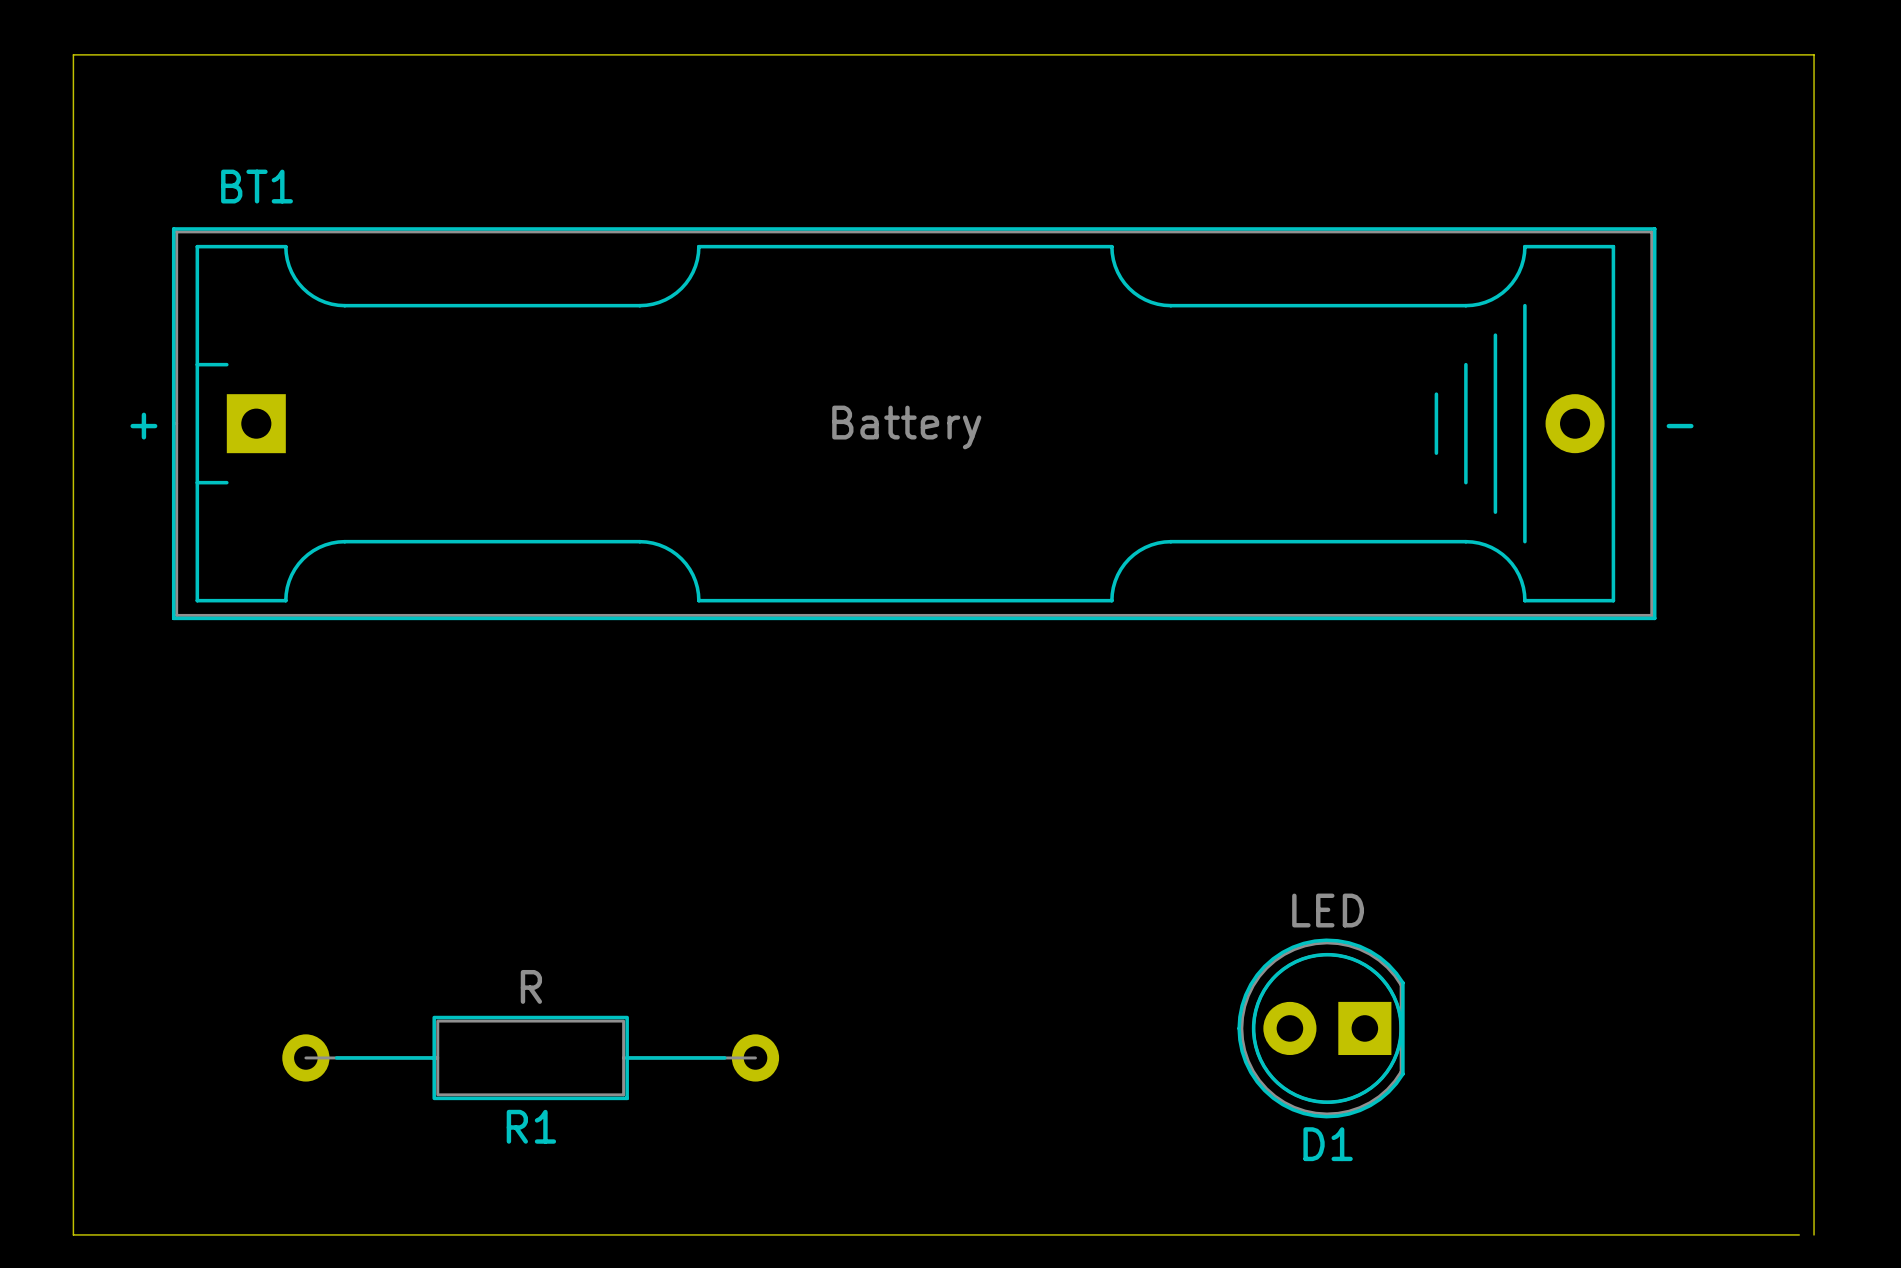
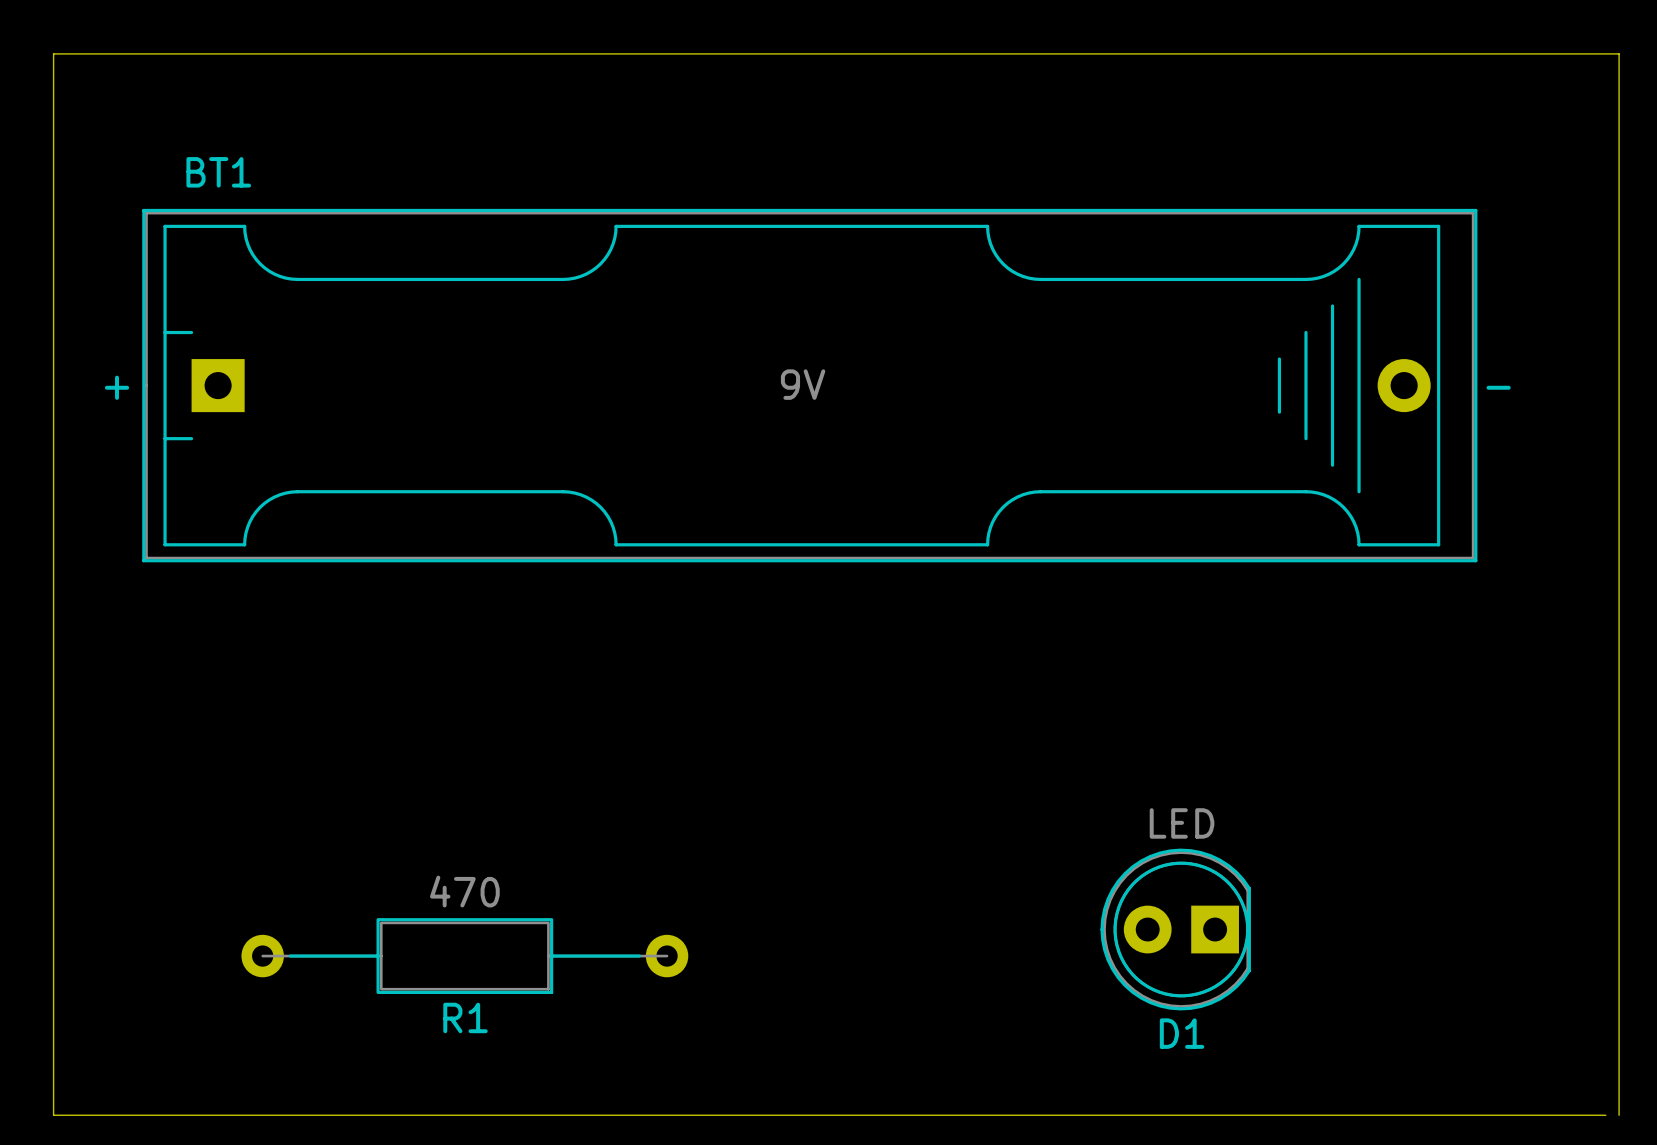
BT1 value: Battery (906, 427) -> 9V (803, 384)
R1 value: R (531, 986) -> 470 (464, 891)

